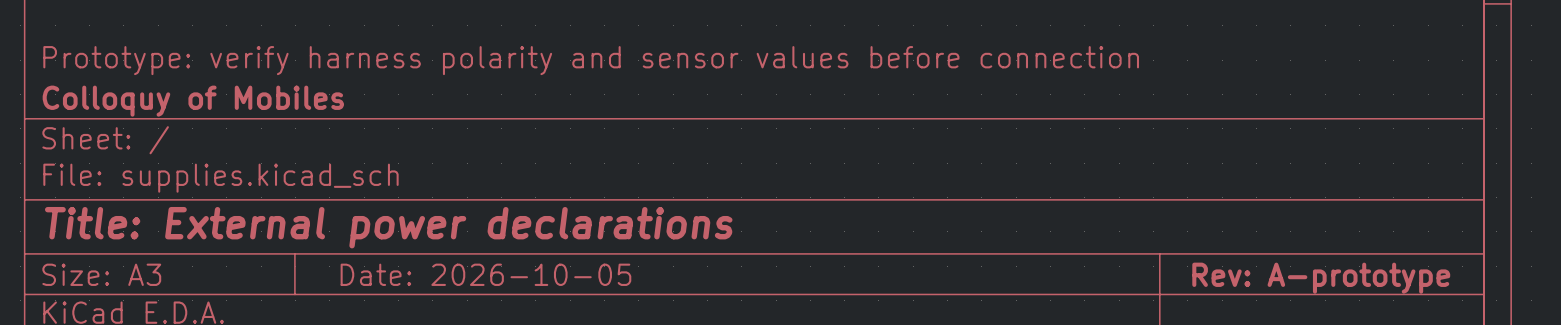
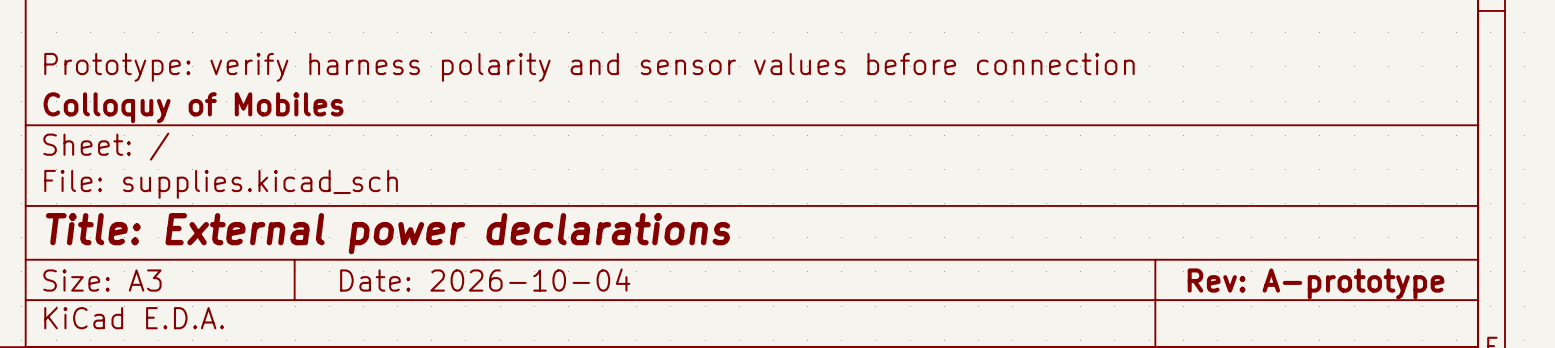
title block: Date: 2026-10-05 (485, 274) -> Date: 2026-10-04 (485, 280)

